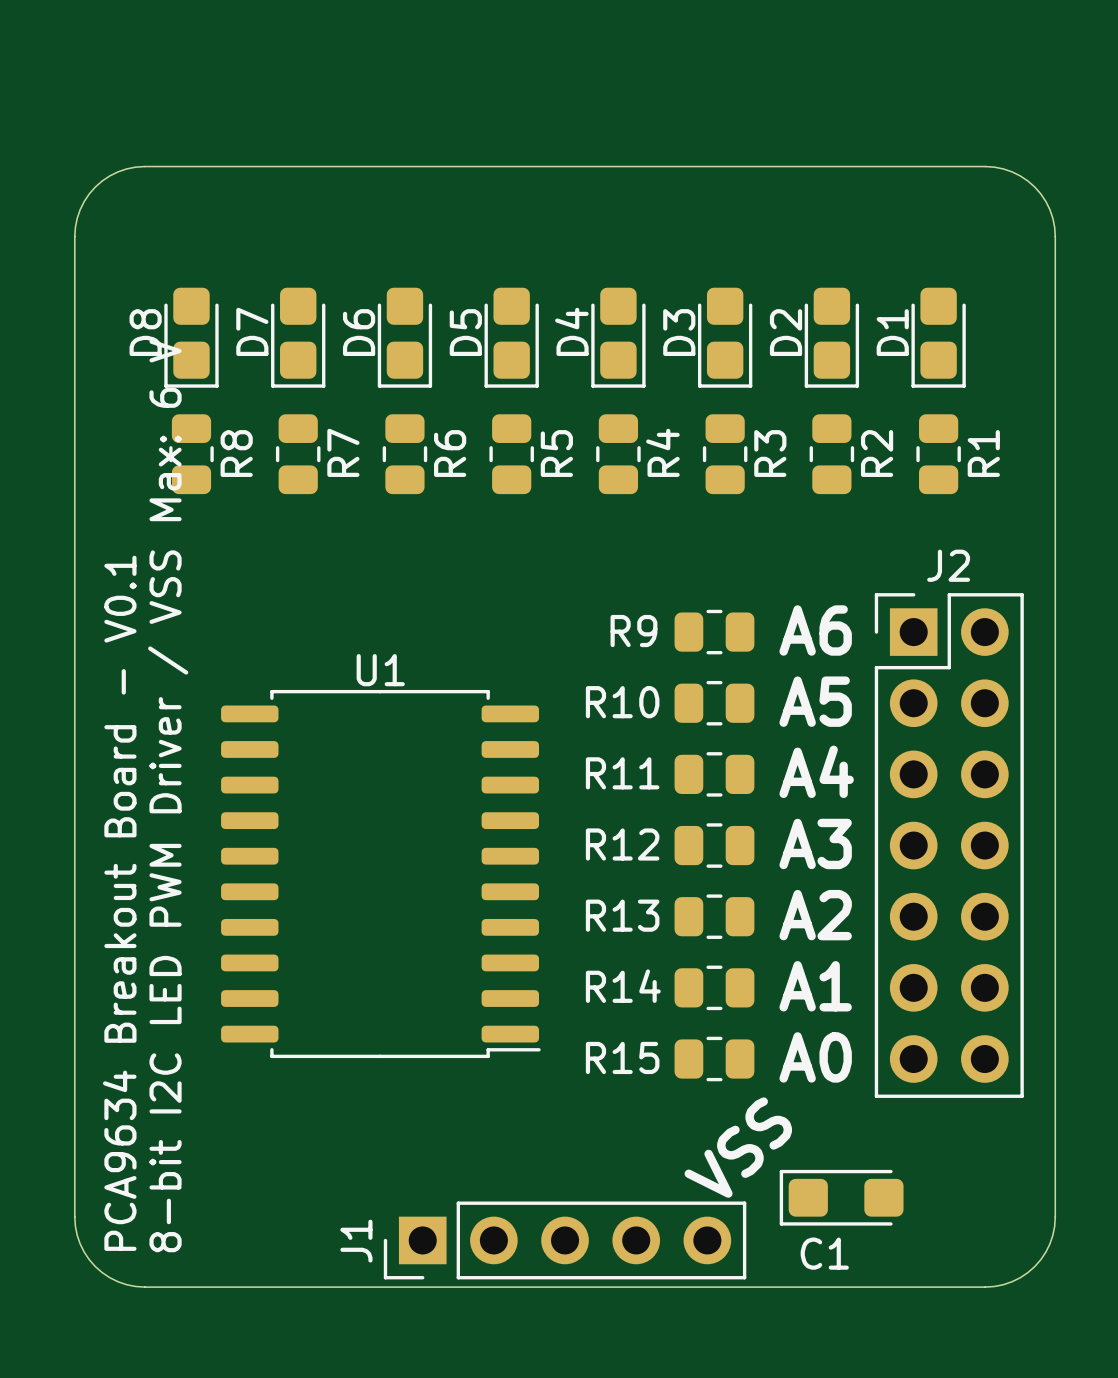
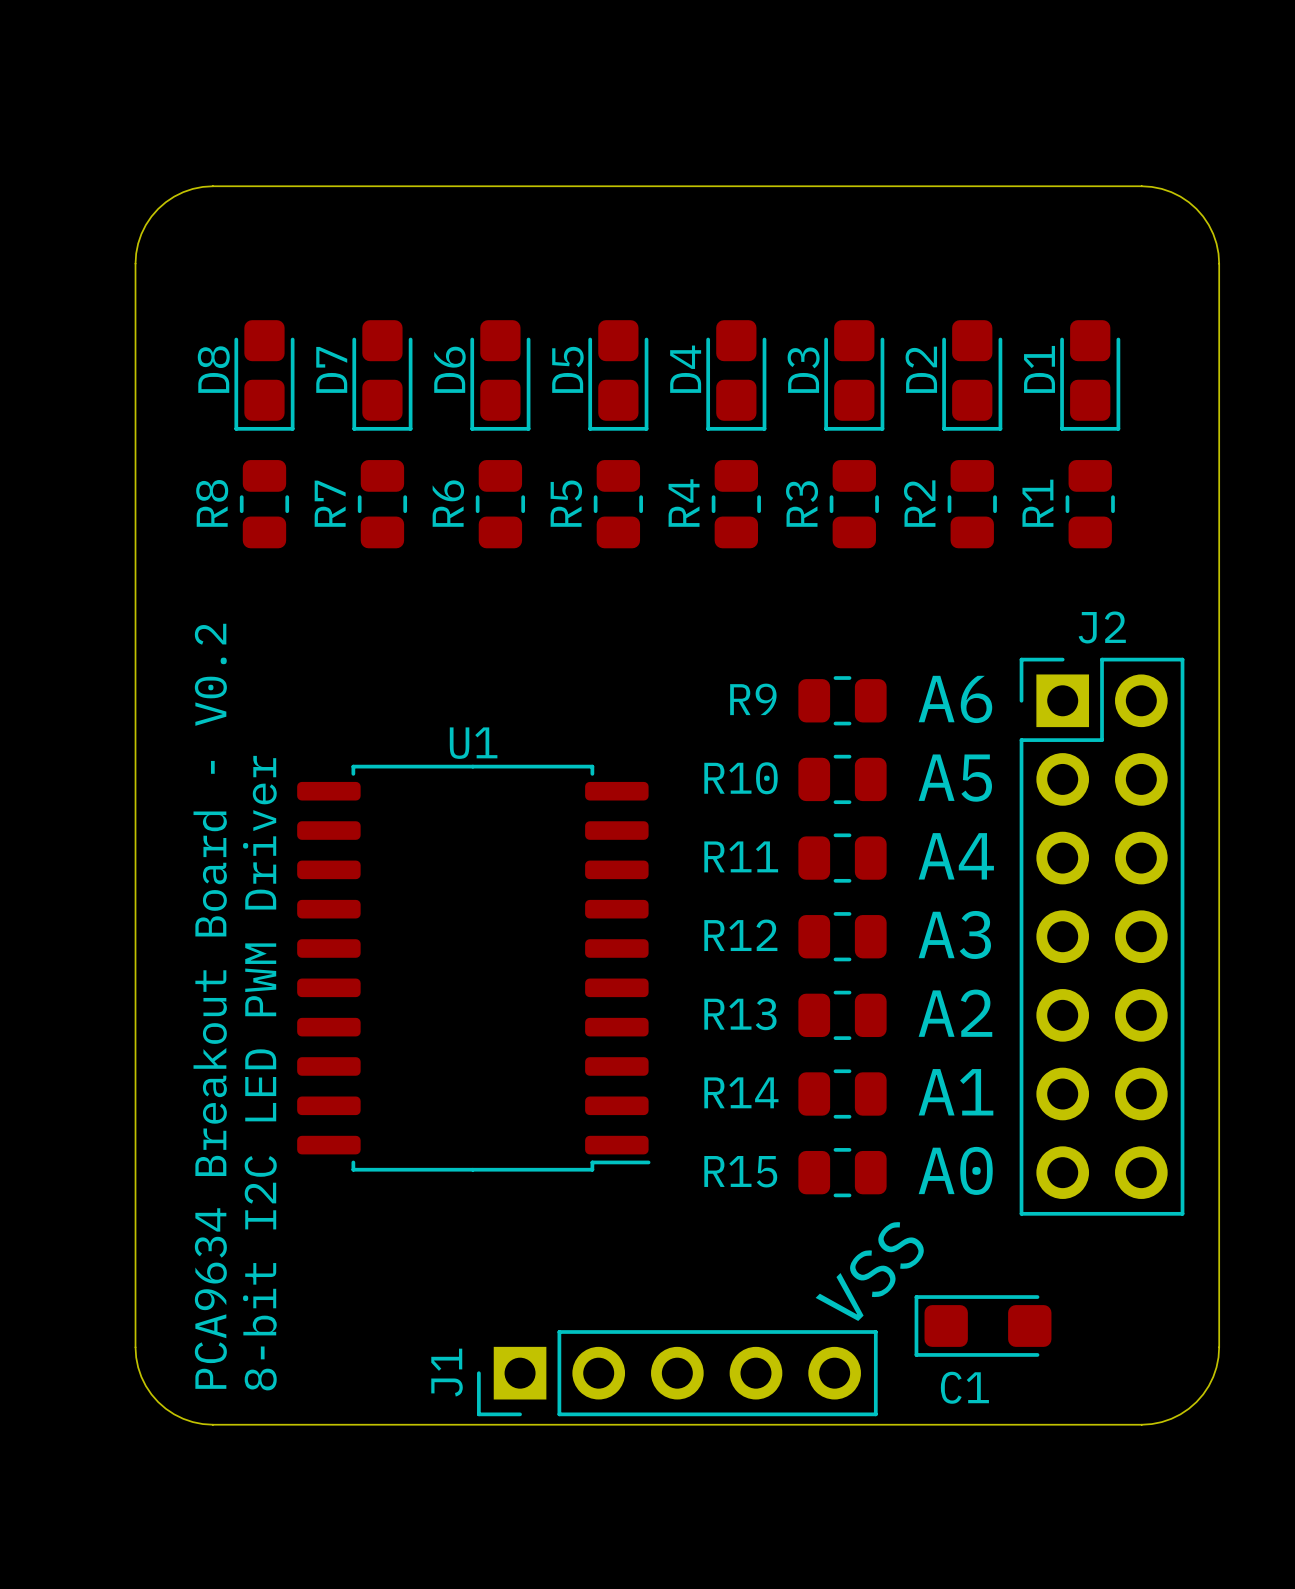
R7 name position: R7 (343, 452) -> R7 (330, 503)
R4 name position: R4 (662, 452) -> R4 (684, 503)
R8 name position: R8 (236, 453) -> R8 (212, 503)
R6 name position: R6 (450, 453) -> R6 (448, 503)
R5 name position: R5 (556, 453) -> R5 (566, 503)
R3 name position: R3 (770, 453) -> R3 (802, 503)
R2 name position: R2 (877, 453) -> R2 (919, 503)
R1 name position: R1 (983, 453) -> R1 (1037, 503)
text: 8-bit I2C LED PWM Driver / VSS Max: 6 V (168, 795) -> 8-bit I2C LED PWM Driver (259, 1073)
text: PCA9634 Breakout Board - V0.1 (119, 903) -> PCA9634 Breakout Board - V0.2 (210, 1006)

